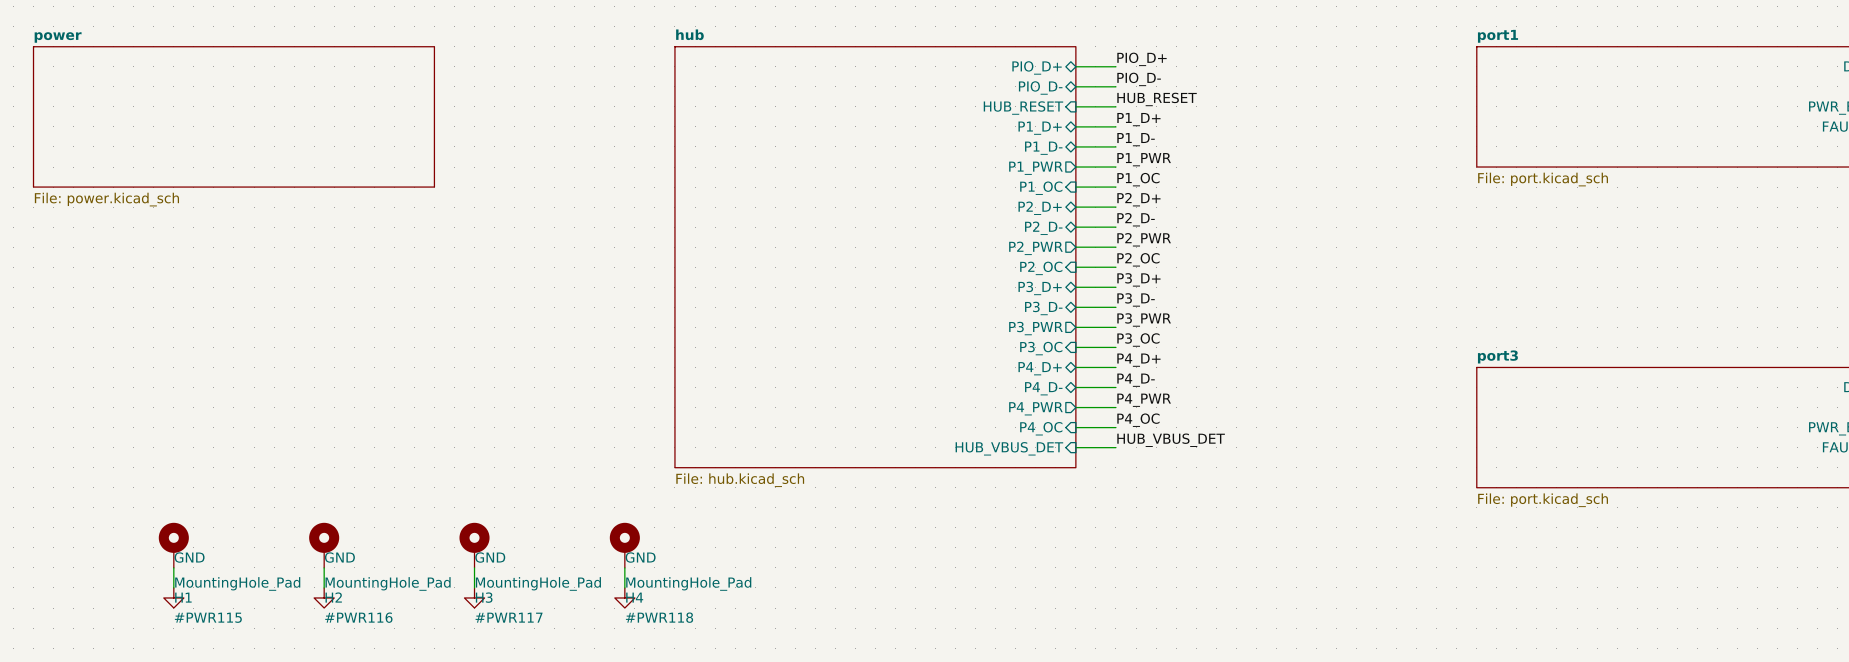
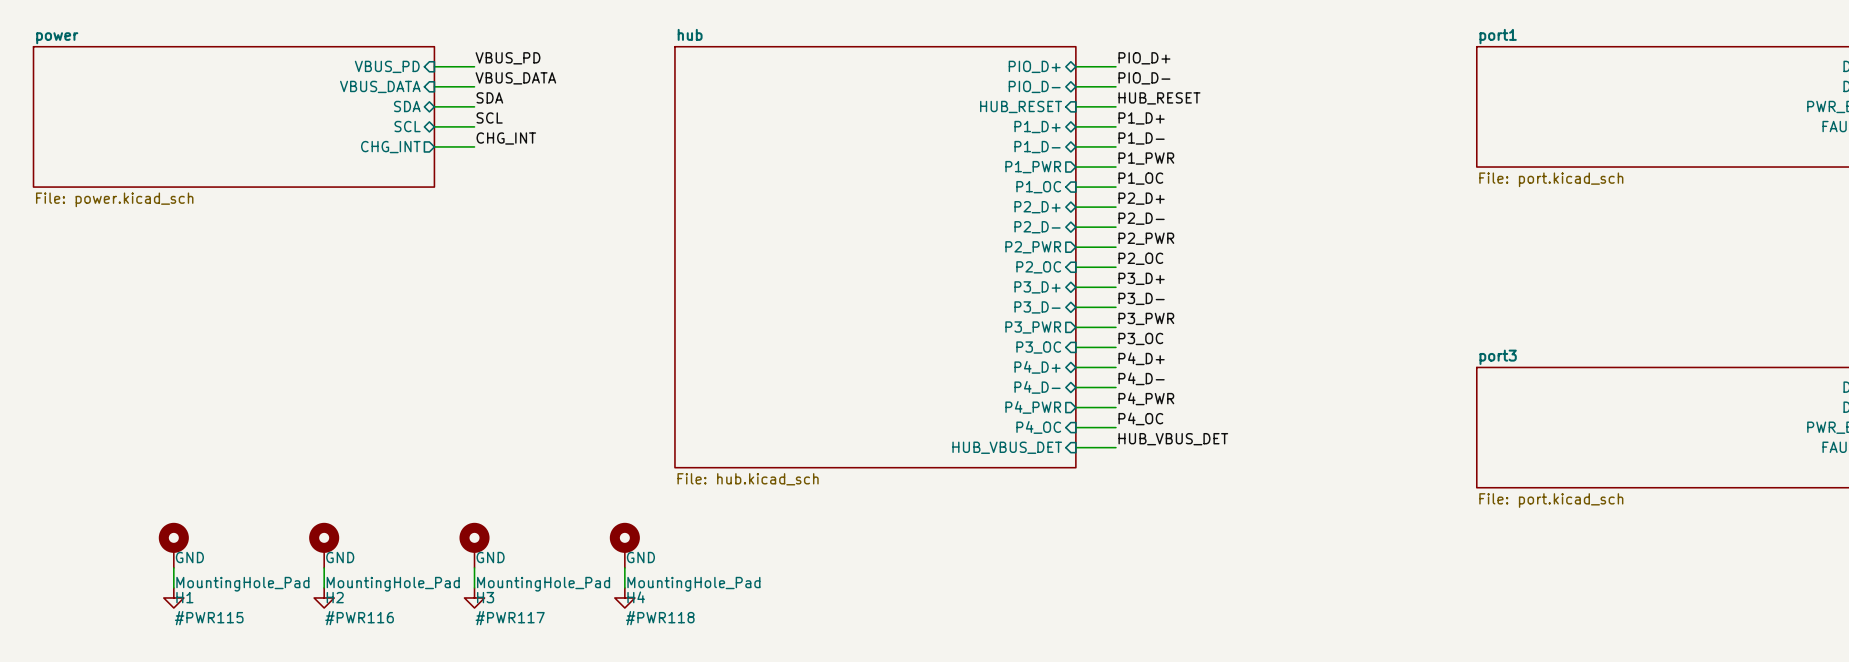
label: none -> VBUS_PD (507, 58)
wire: none -> (434, 66) (474, 66)
sheet pin: none -> VBUS_PD (387, 66)
label: none -> VBUS_DATA (515, 78)
wire: none -> (434, 86) (474, 86)
sheet pin: none -> VBUS_DATA (380, 86)
label: none -> SDA (489, 97)
sheet pin: none -> SDA (407, 106)
wire: none -> (434, 106) (474, 106)
label: none -> SCL (489, 117)
sheet pin: none -> SCL (407, 126)
wire: none -> (434, 126) (474, 126)
label: none -> CHG_INT (506, 138)
wire: none -> (434, 146) (474, 146)
sheet pin: none -> CHG_INT (390, 147)

